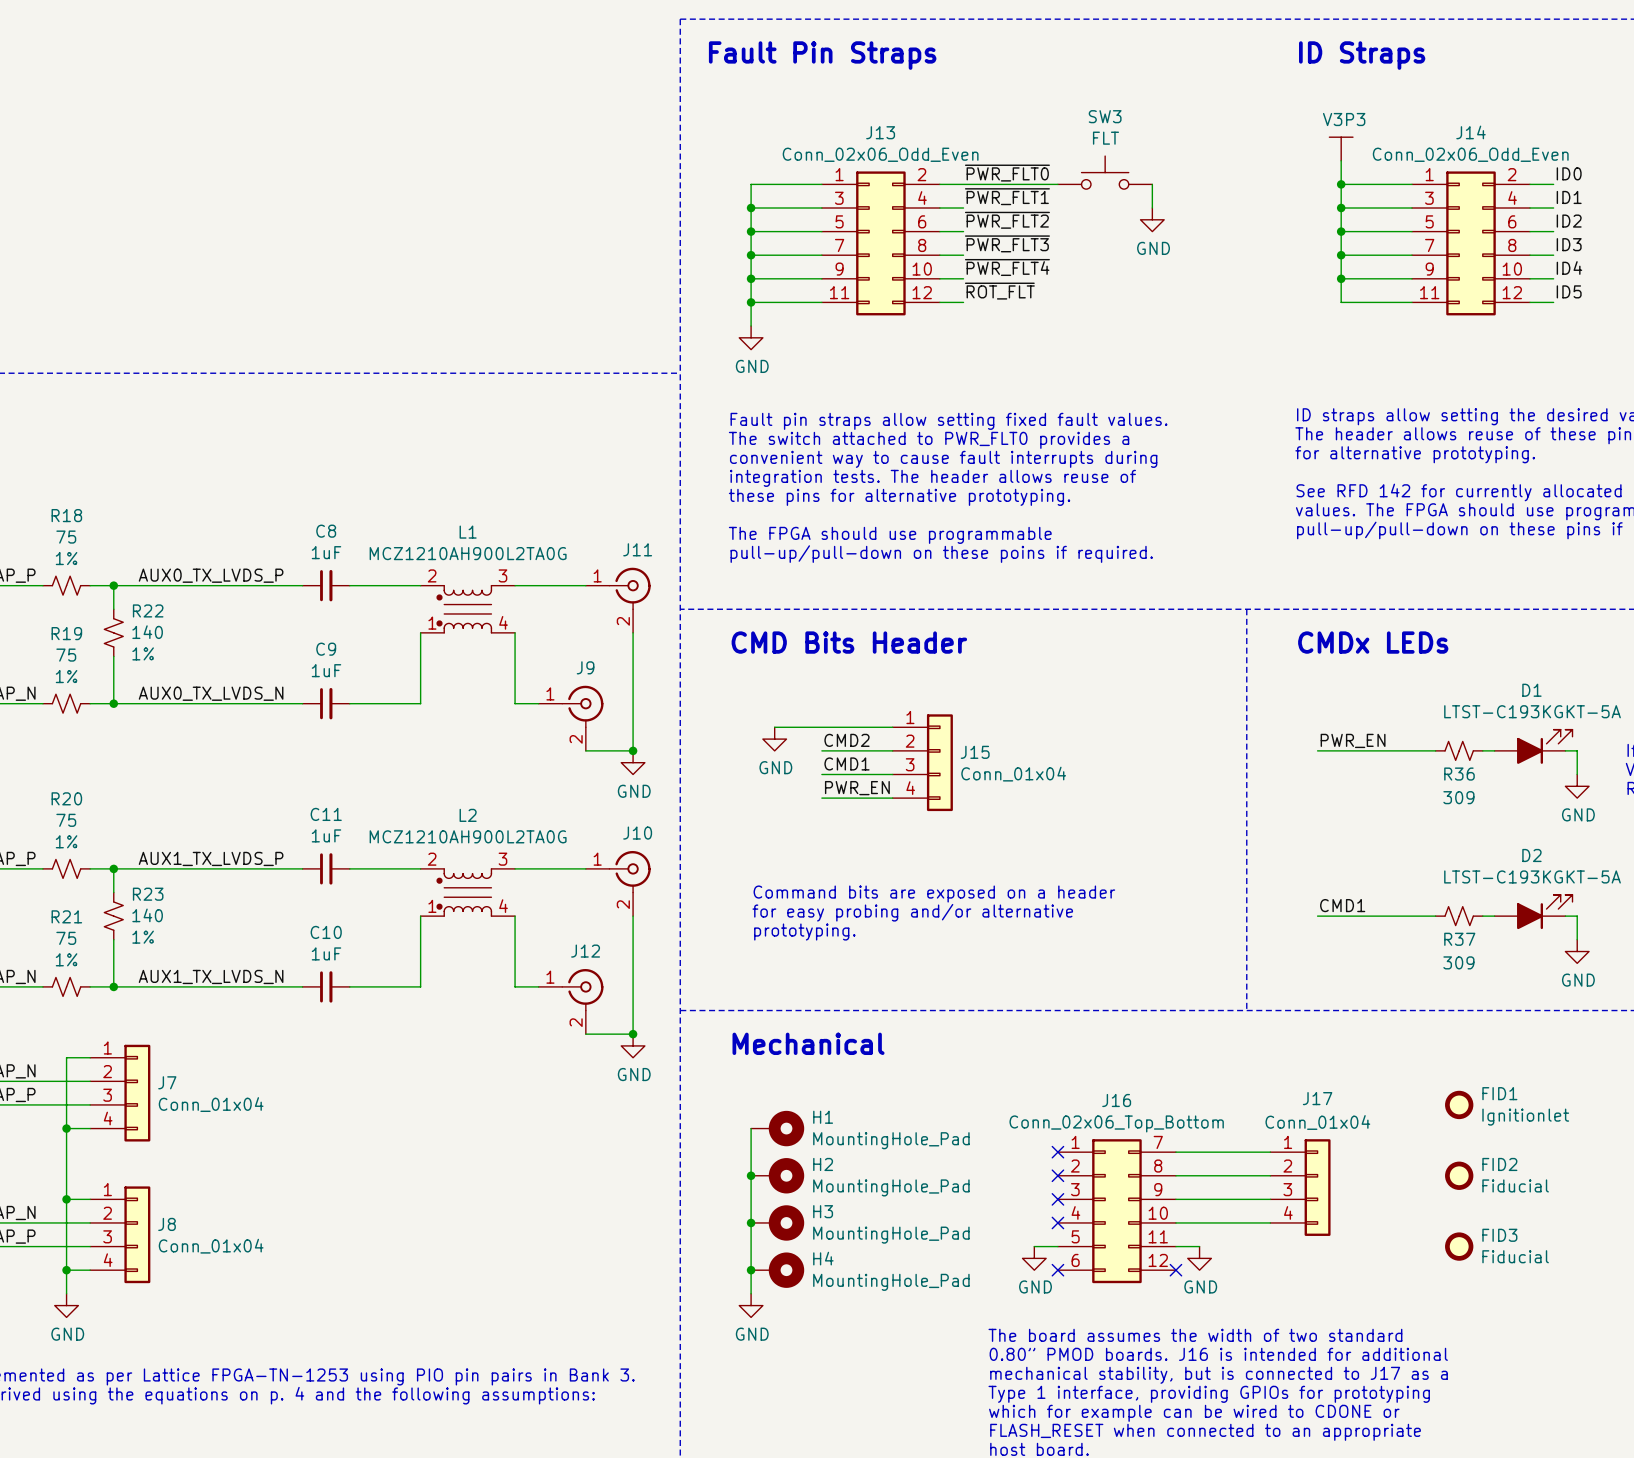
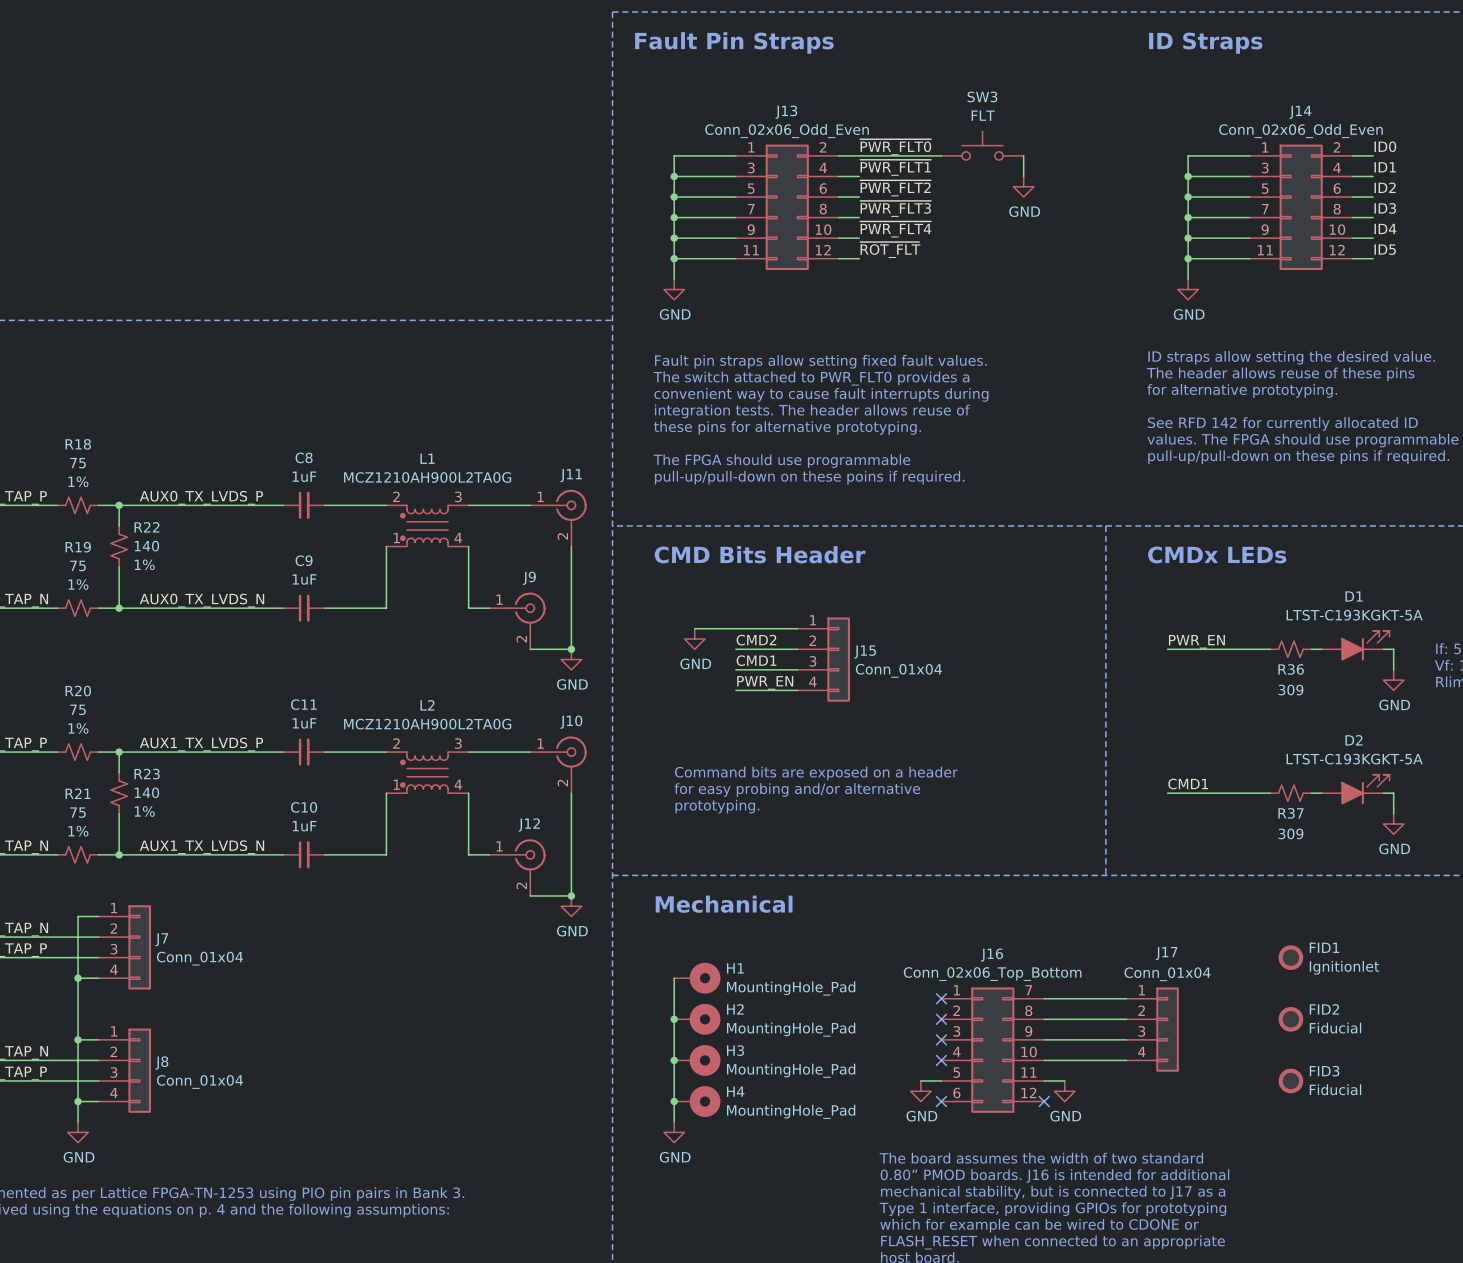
power symbol: V3P3 (1288, 137) -> none
wire: (1341, 160) (1341, 184) -> (1188, 258) (1188, 279)
junction: (1341, 184) -> none
junction: none -> (1188, 258)
power symbol: none -> GND (1188, 289)

